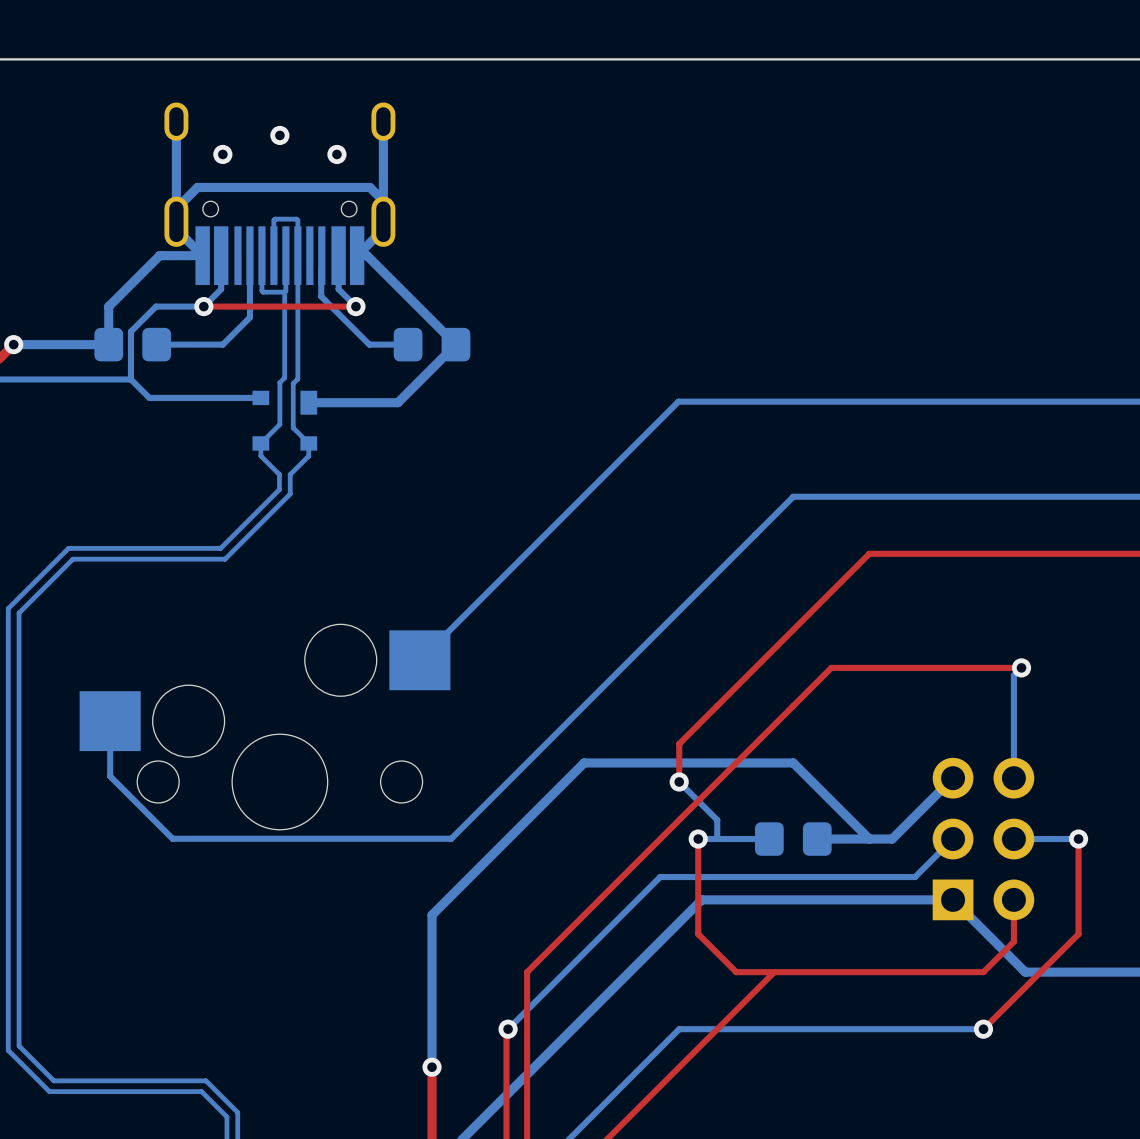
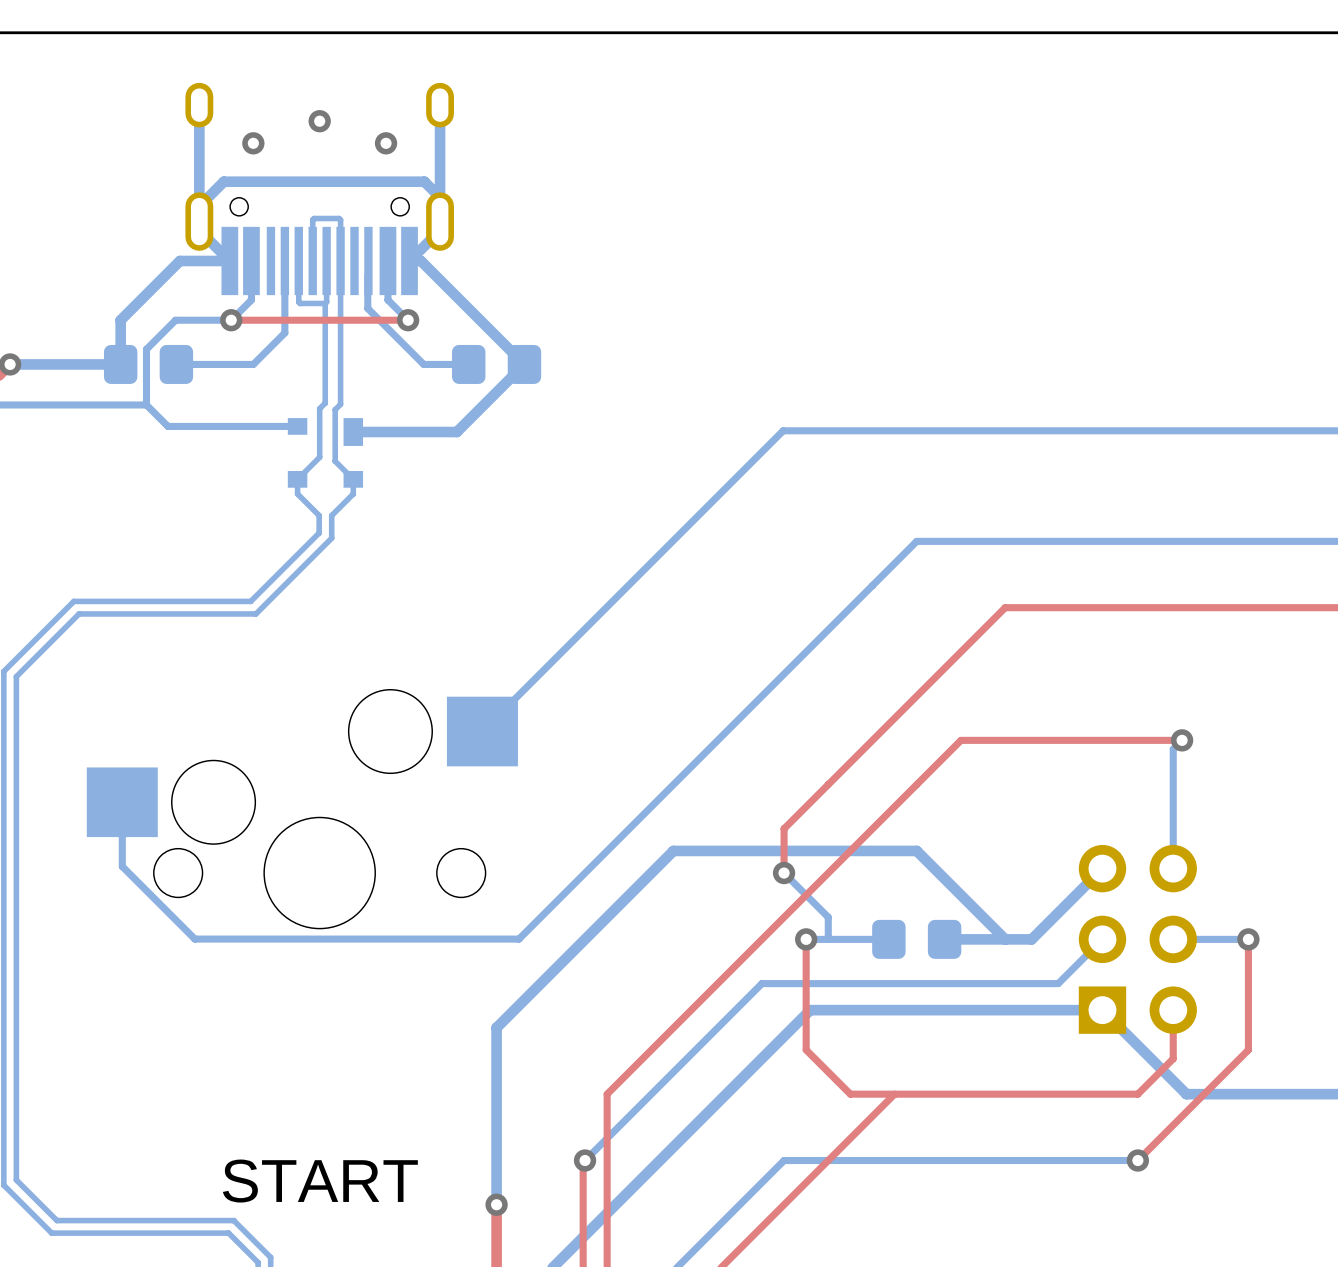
text: none -> START (320, 1181)

